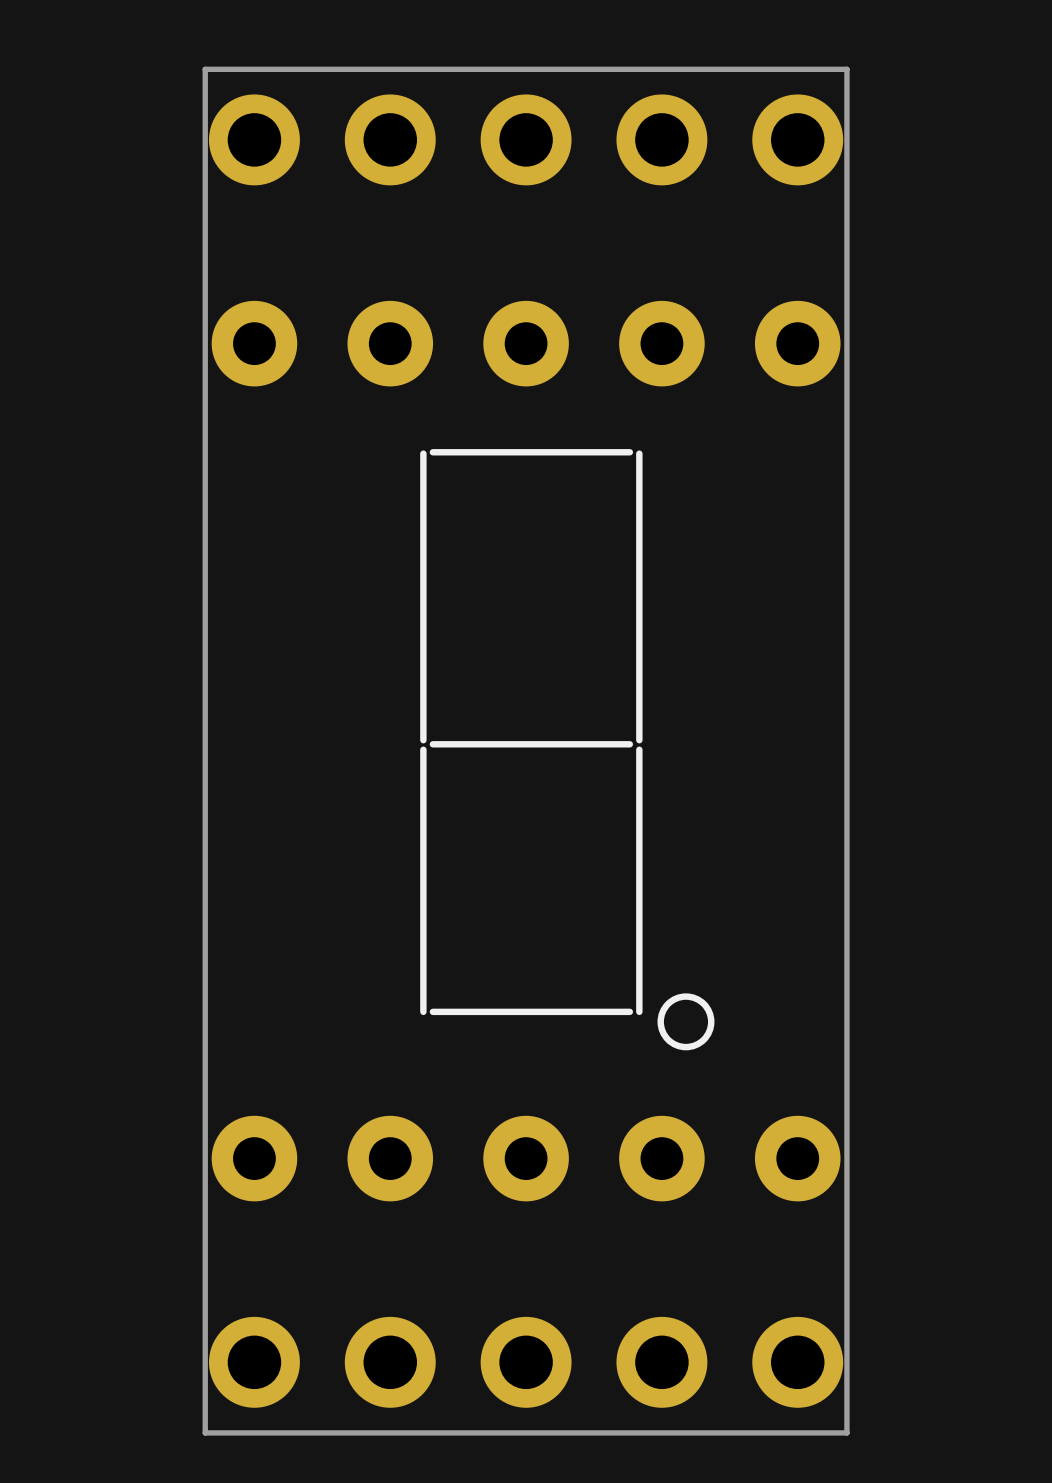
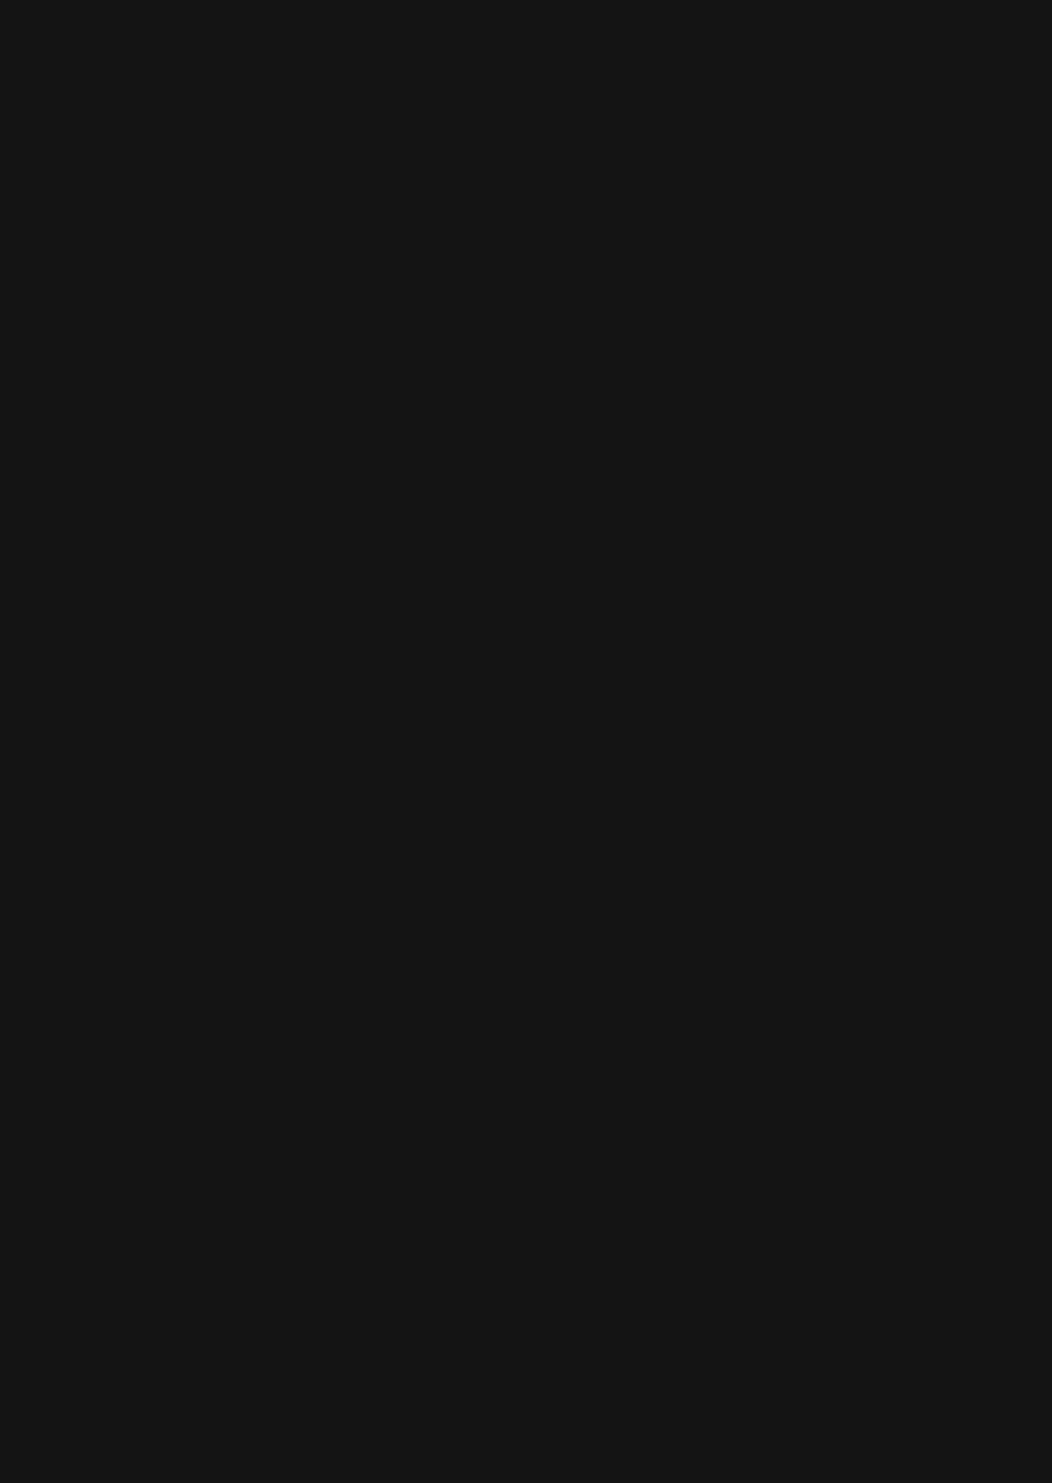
board edge: (205, 69) (846, 69) (846, 1432) (205, 1432) (205, 69) -> none
part: (526, 139) -> none
part: (526, 751) -> none
part: (526, 1362) -> none

